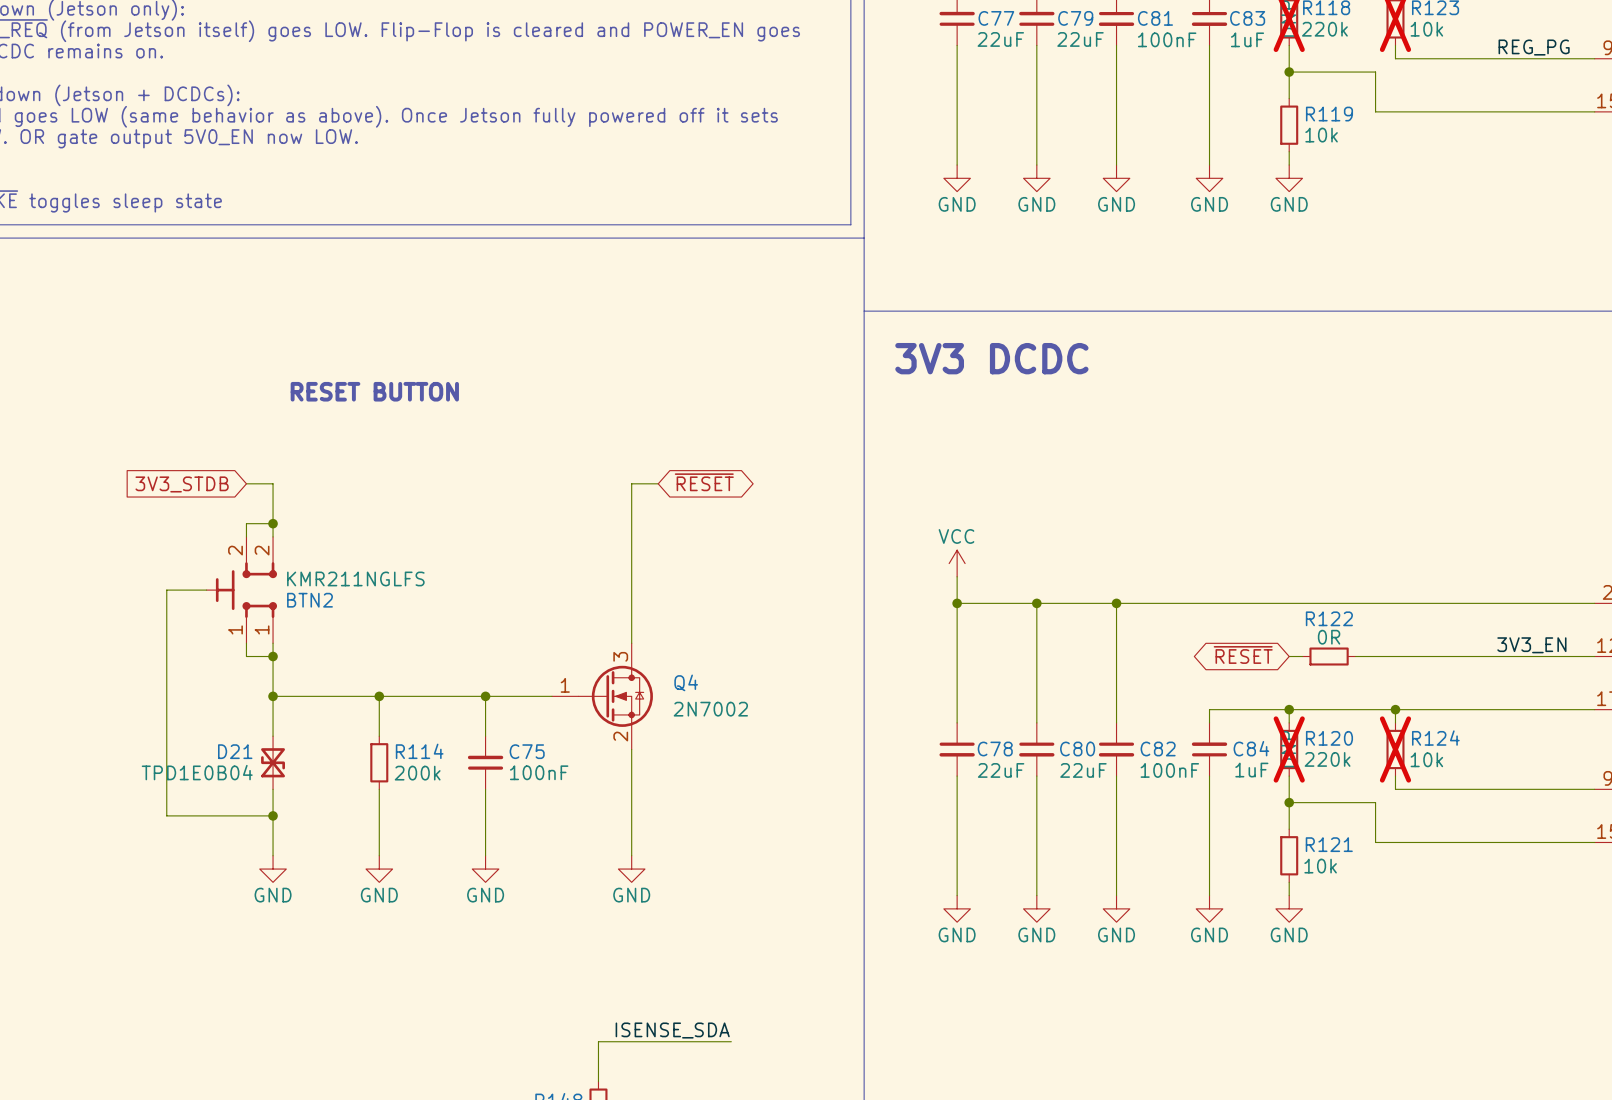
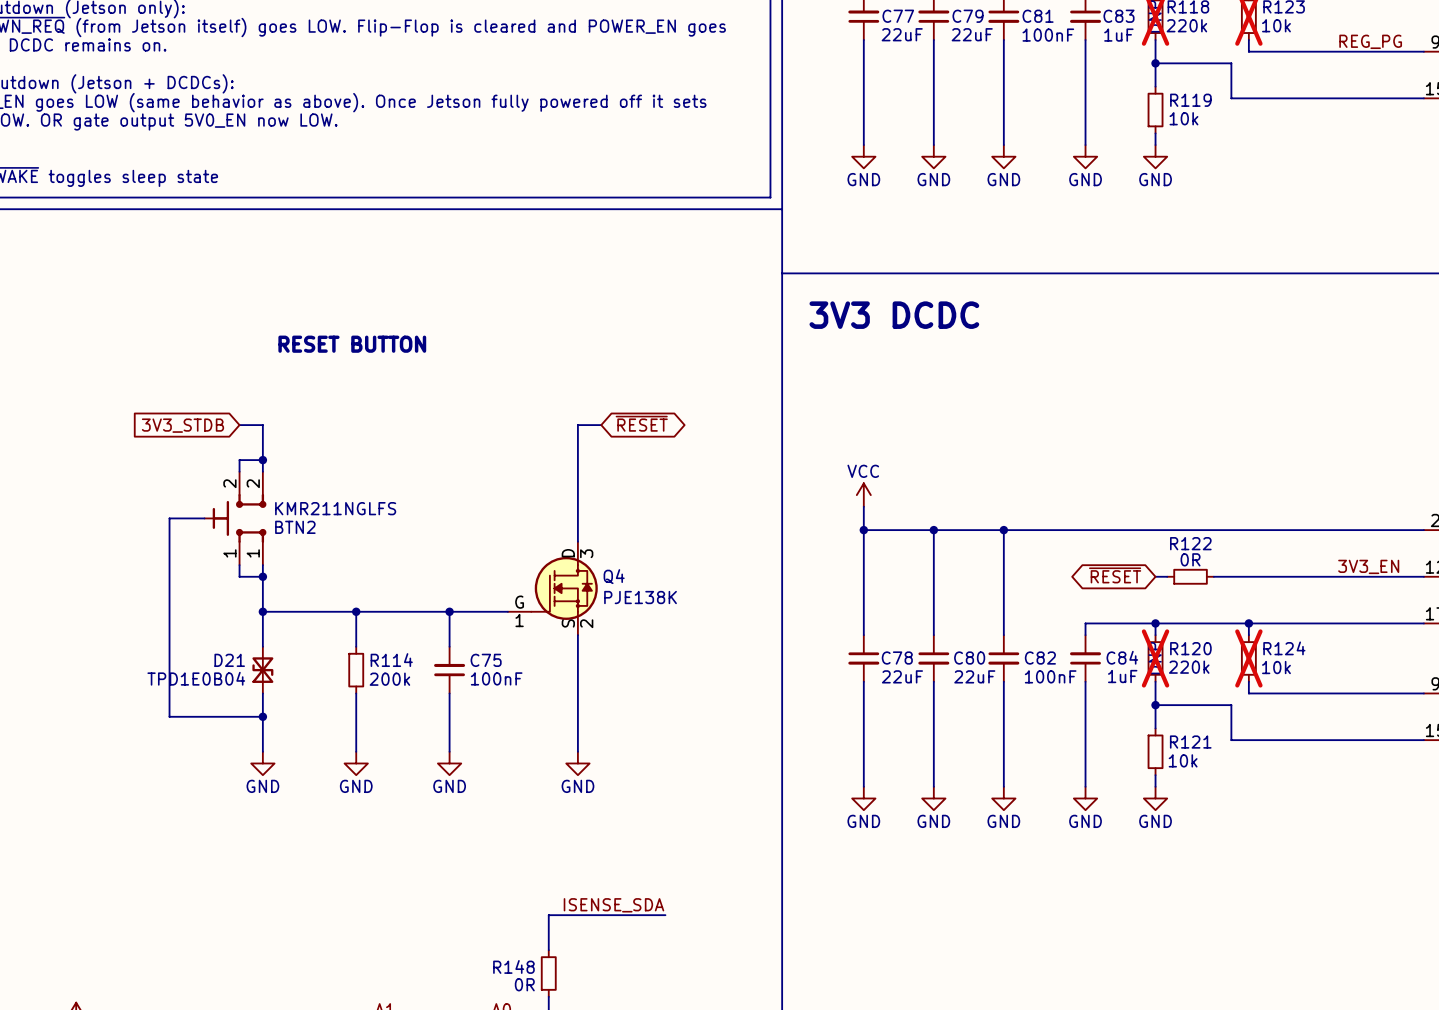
Q4 symbol: [551, 643, 653, 750] -> [507, 541, 598, 636]
Q4 value: 2N7002 (710, 709) -> PJE138K (640, 597)

